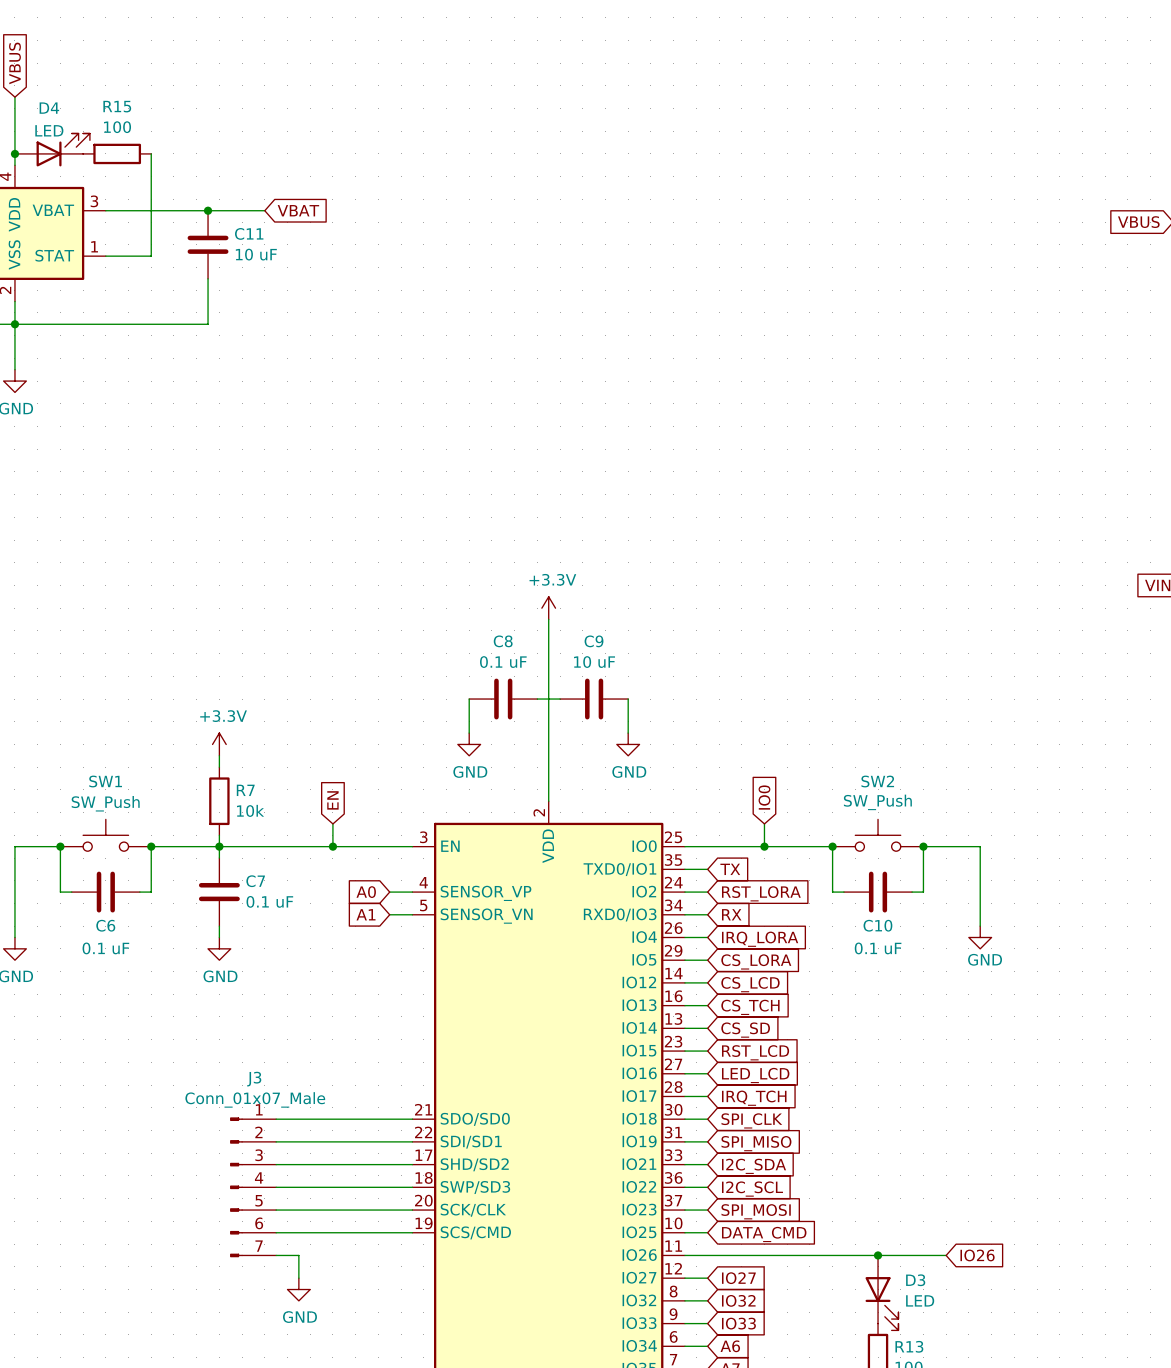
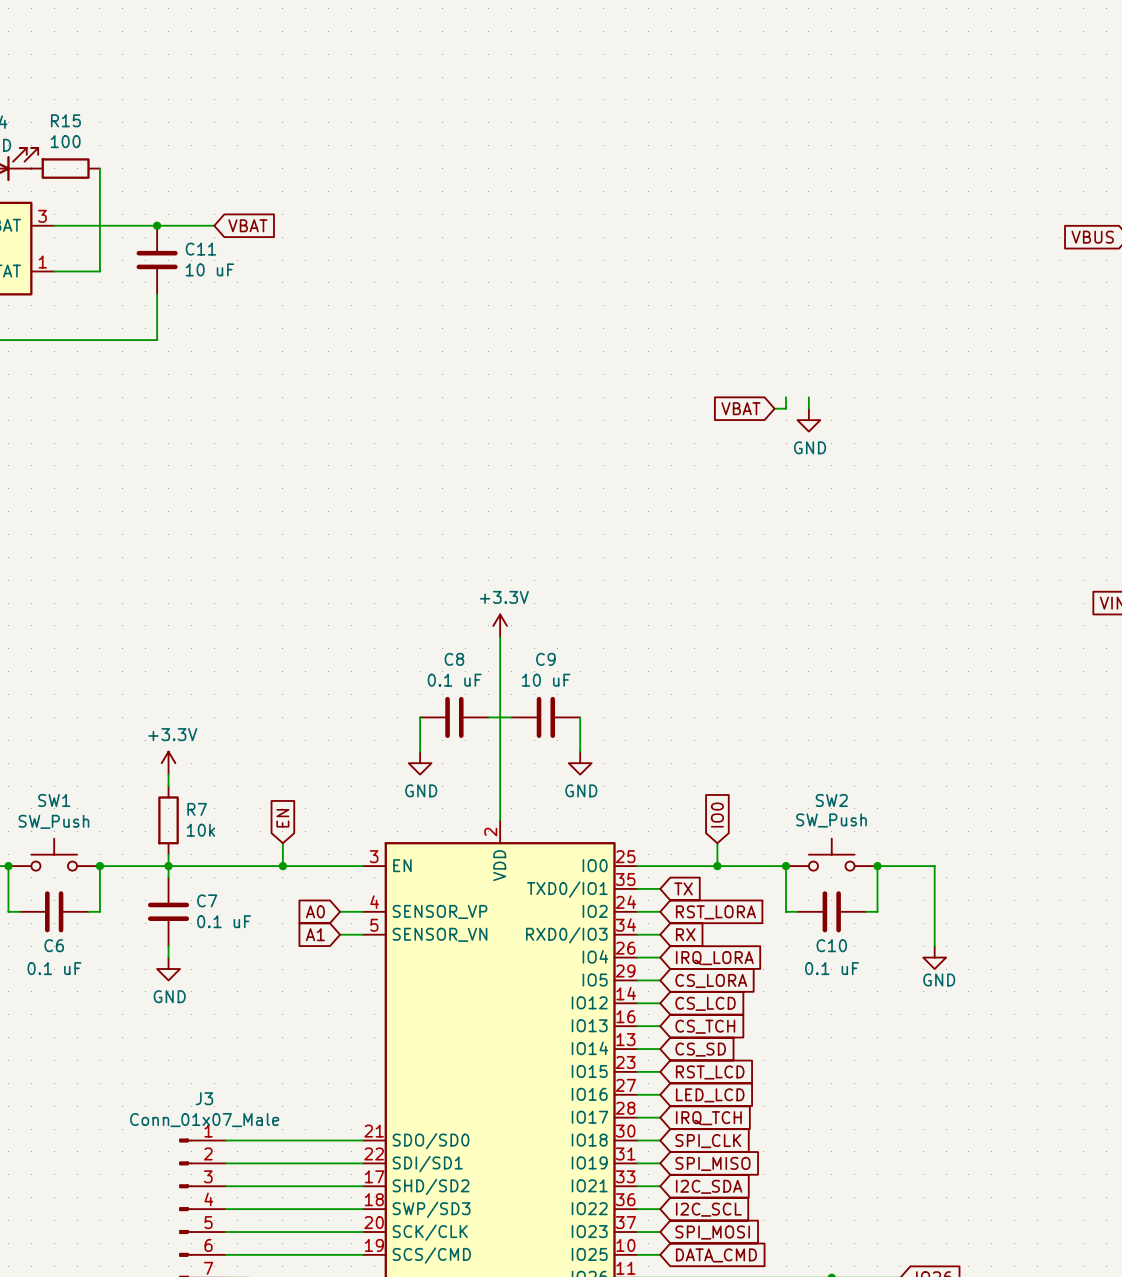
wire: none -> (786, 397) (786, 408) (774, 408)
wire: none -> (808, 397) (808, 408)
global label: none -> VBAT (740, 408)
power symbol: none -> GND (808, 420)

